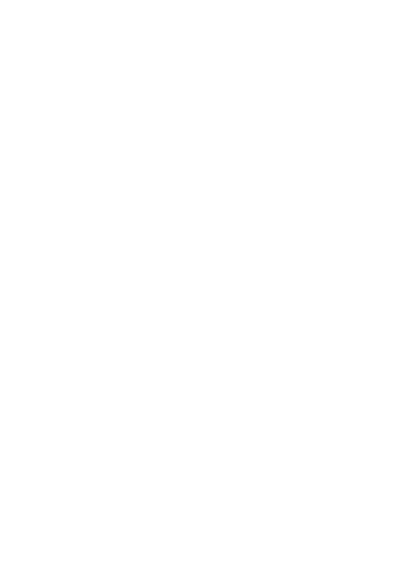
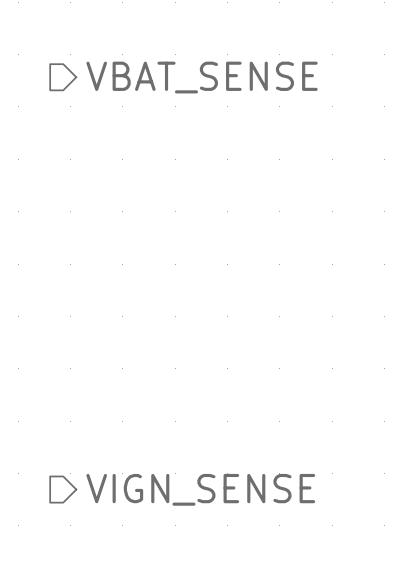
hierarchical label: none -> VBAT_SENSE (202, 77)
hierarchical label: none -> VIGN_SENSE (200, 489)

